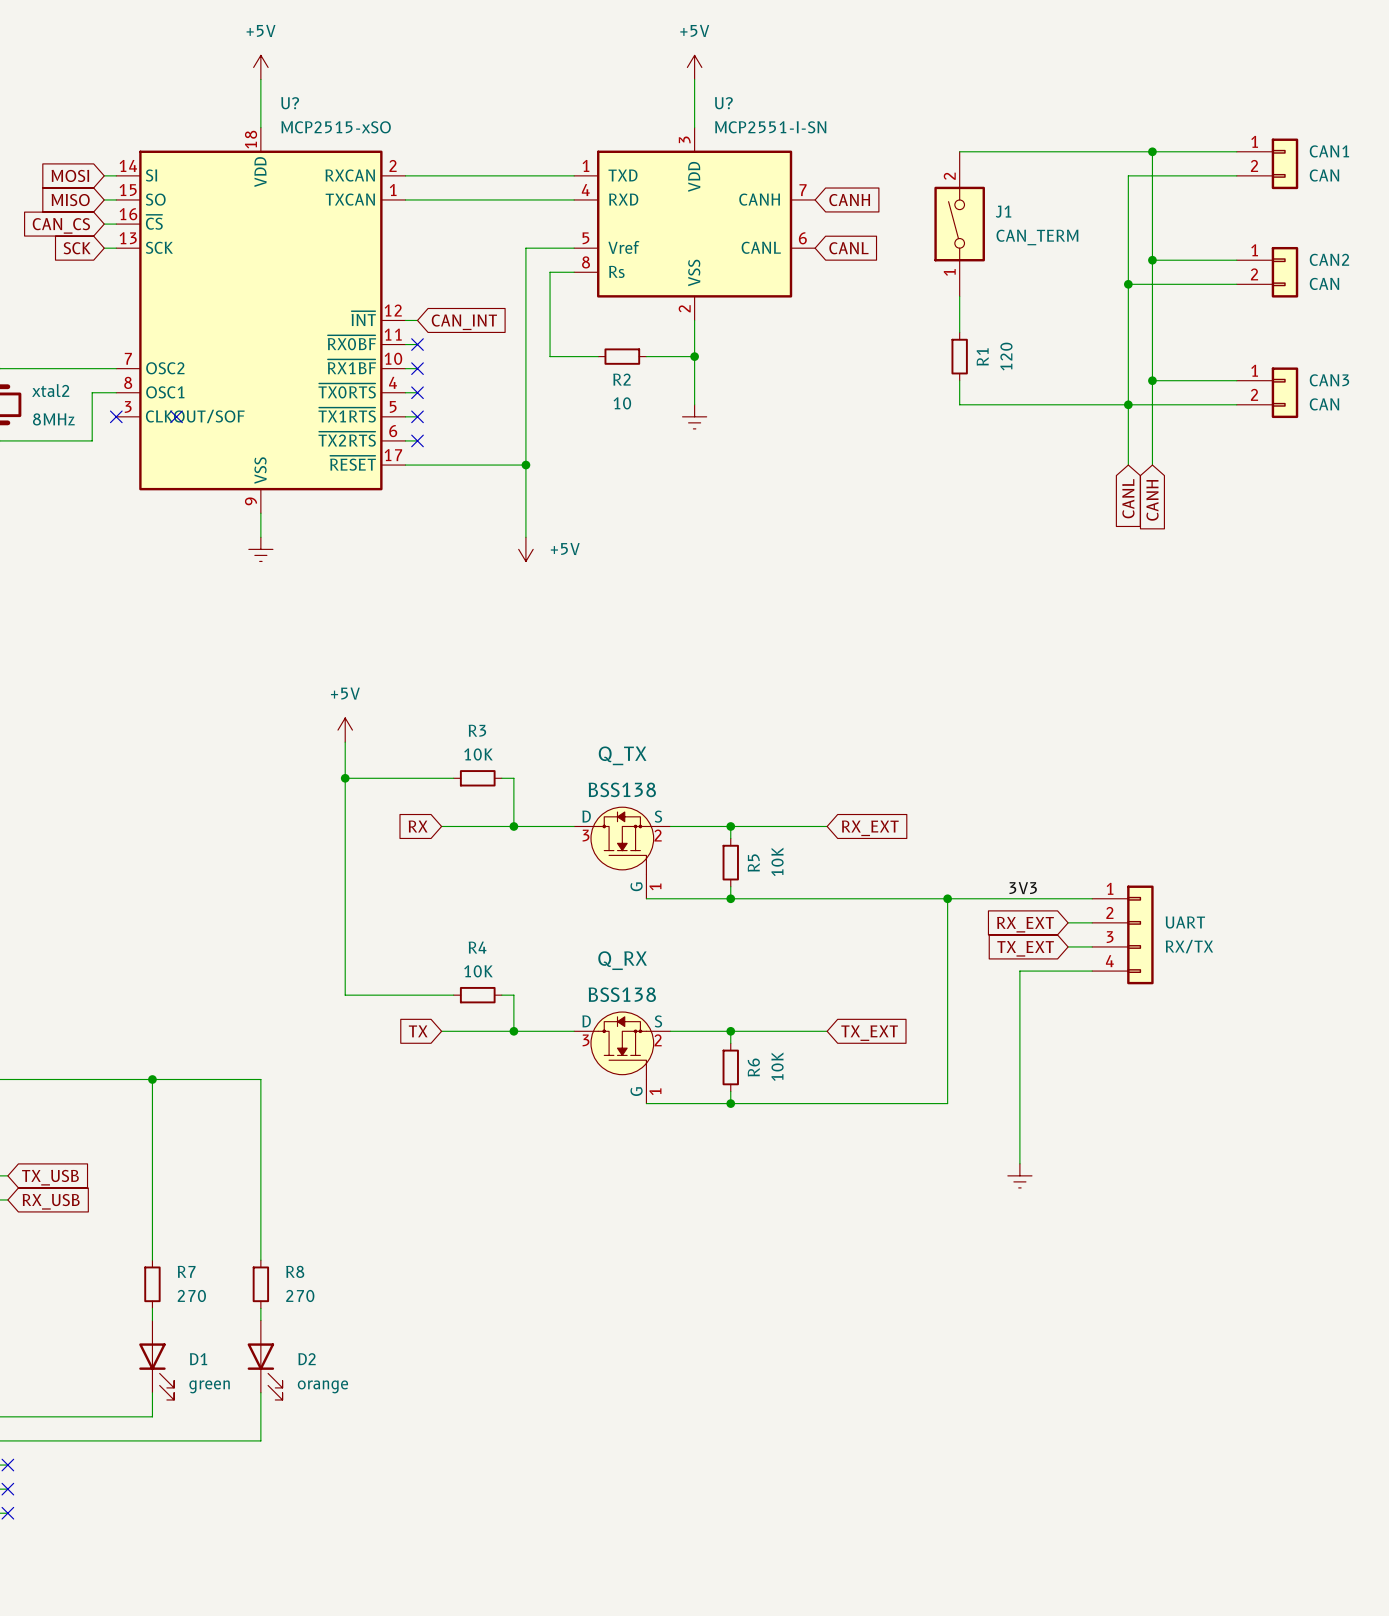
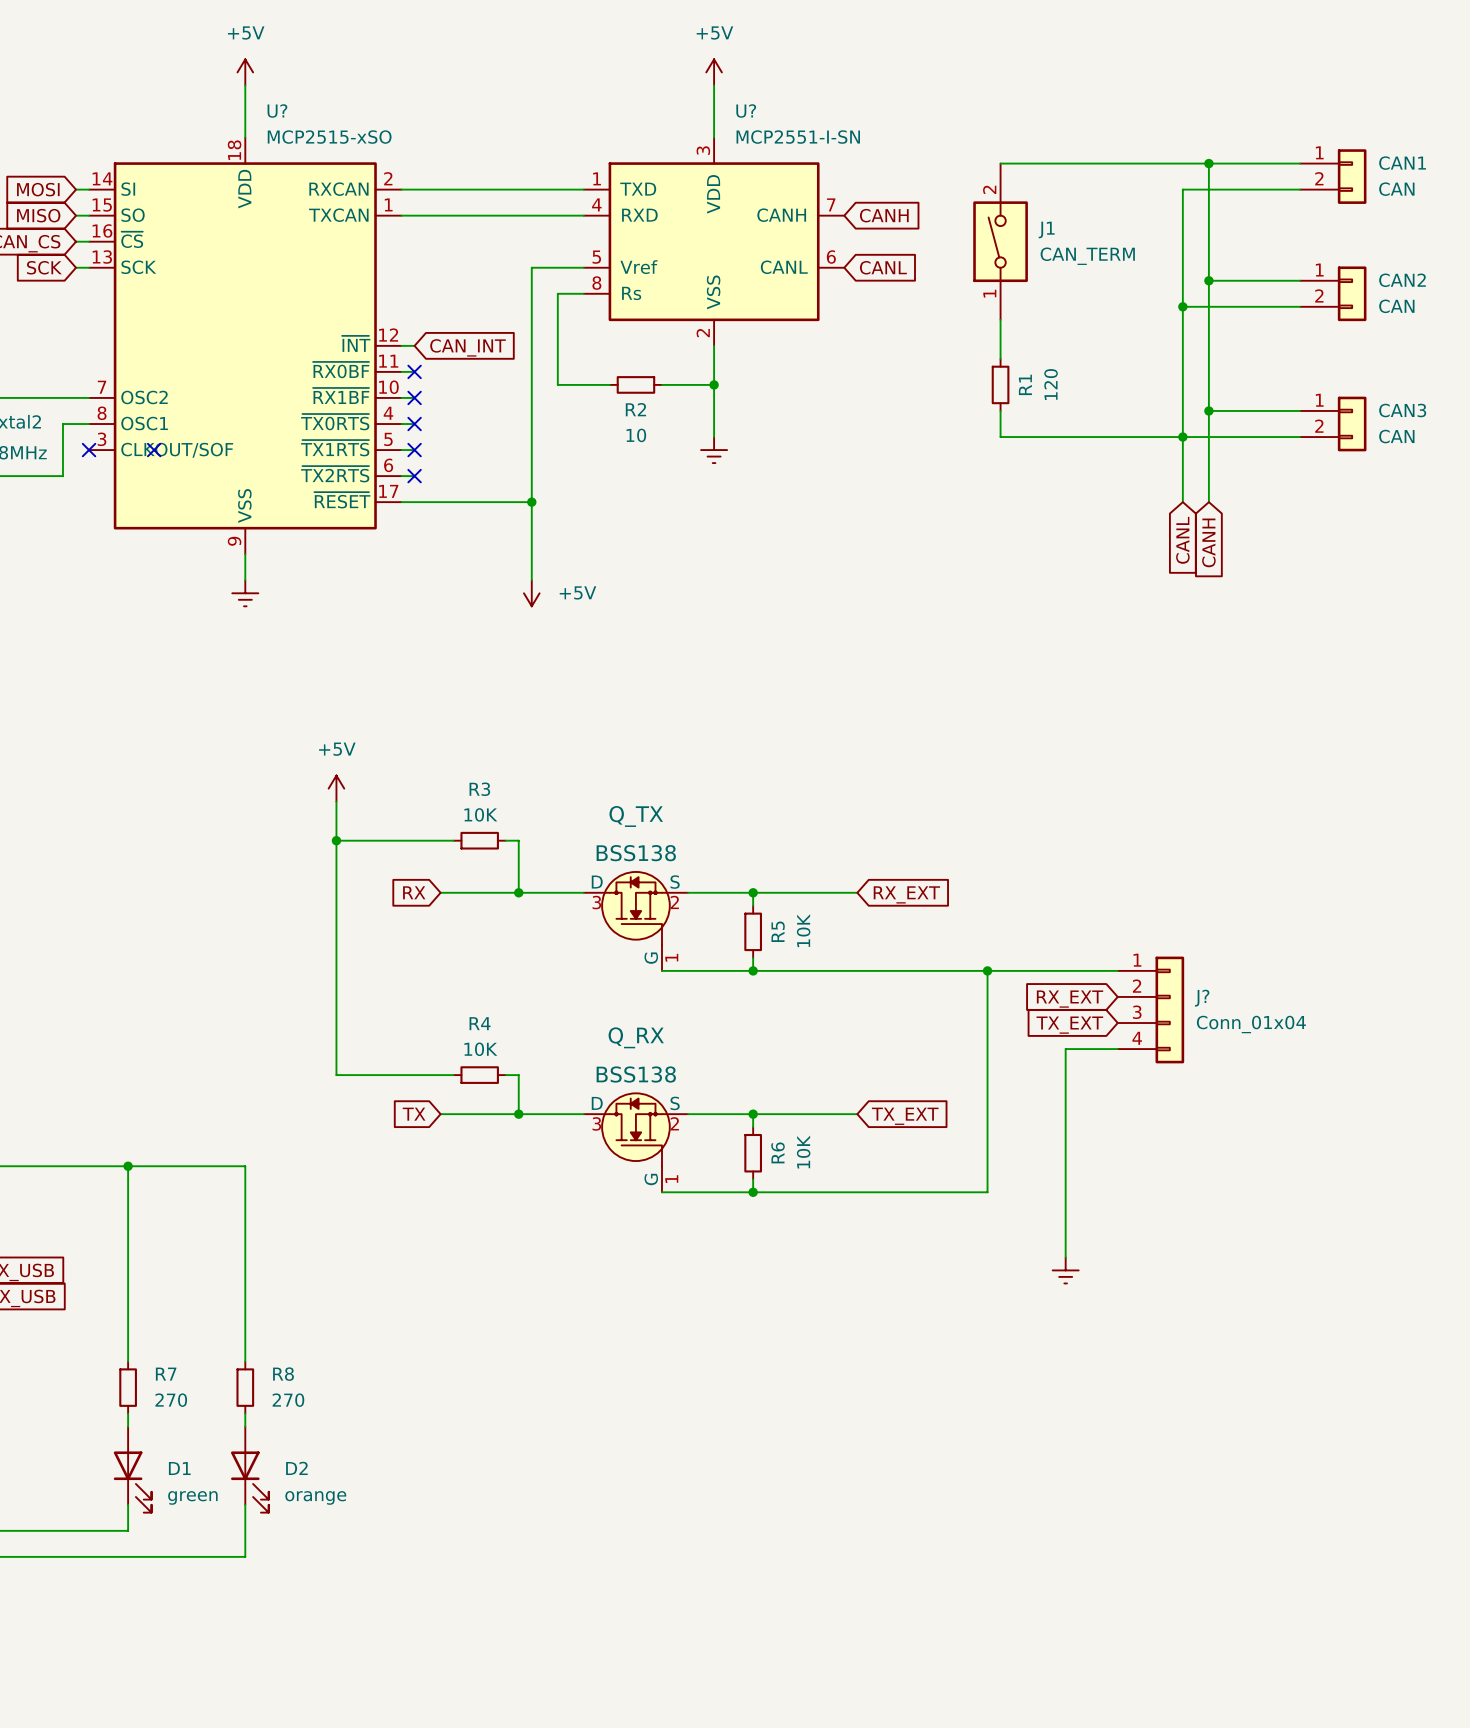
label: 3V3 (1023, 888) -> none
J?: none -> Conn_01x04 (1150, 1009)
UART: RX/TX (1122, 934) -> none

